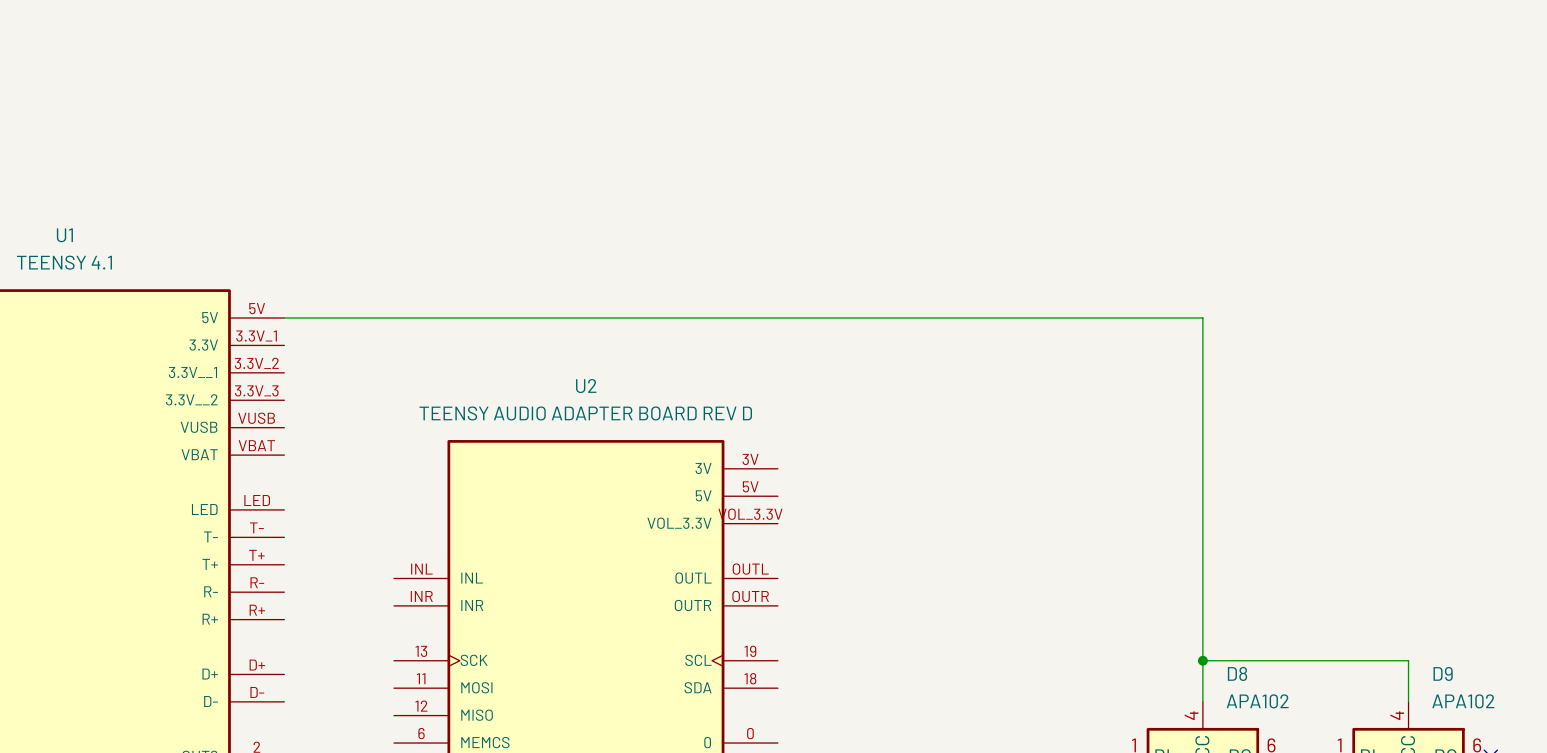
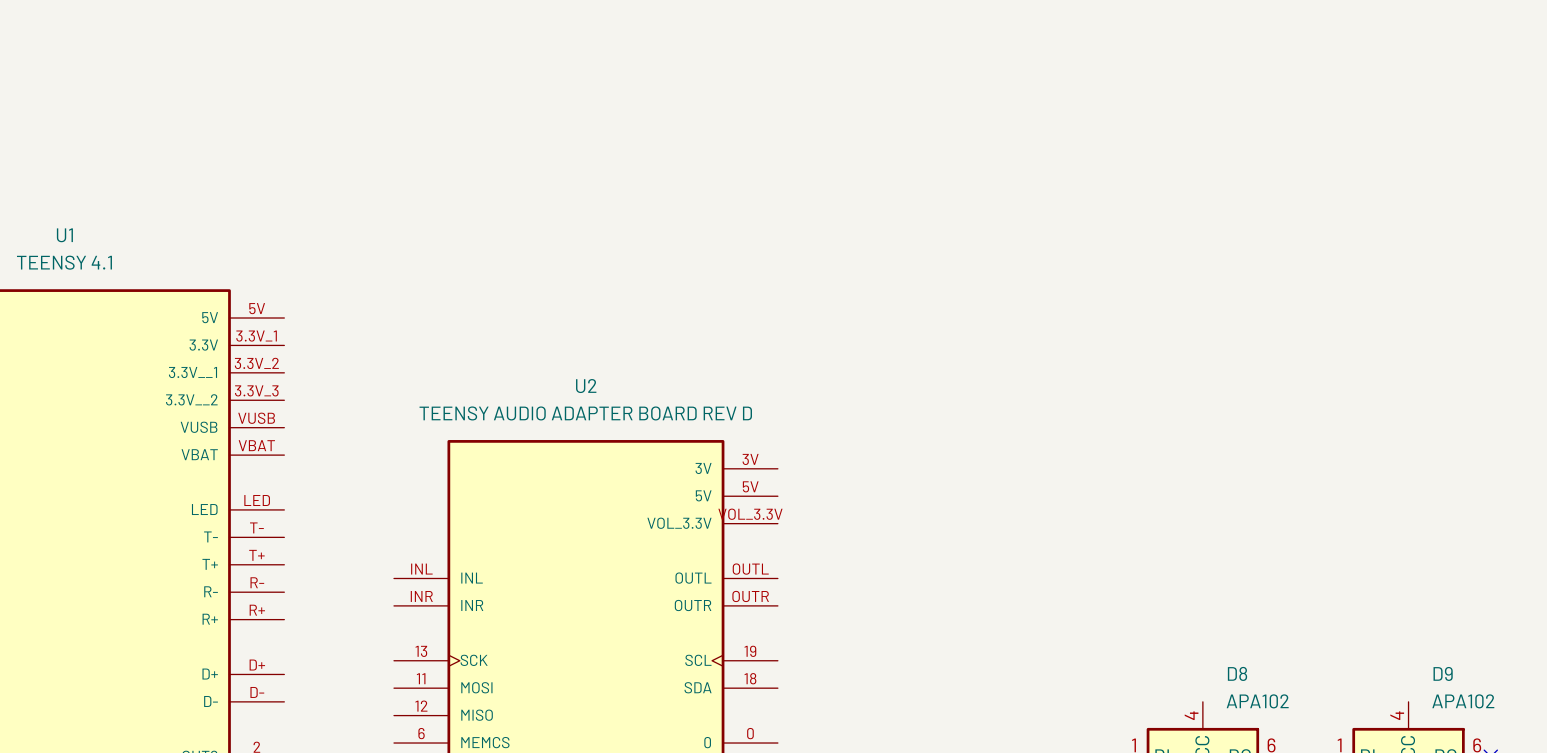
wire: (284, 318) (1202, 318) (1202, 701) -> none
wire: (1202, 660) (1408, 660) (1408, 701) -> none
junction: (1202, 660) -> none

